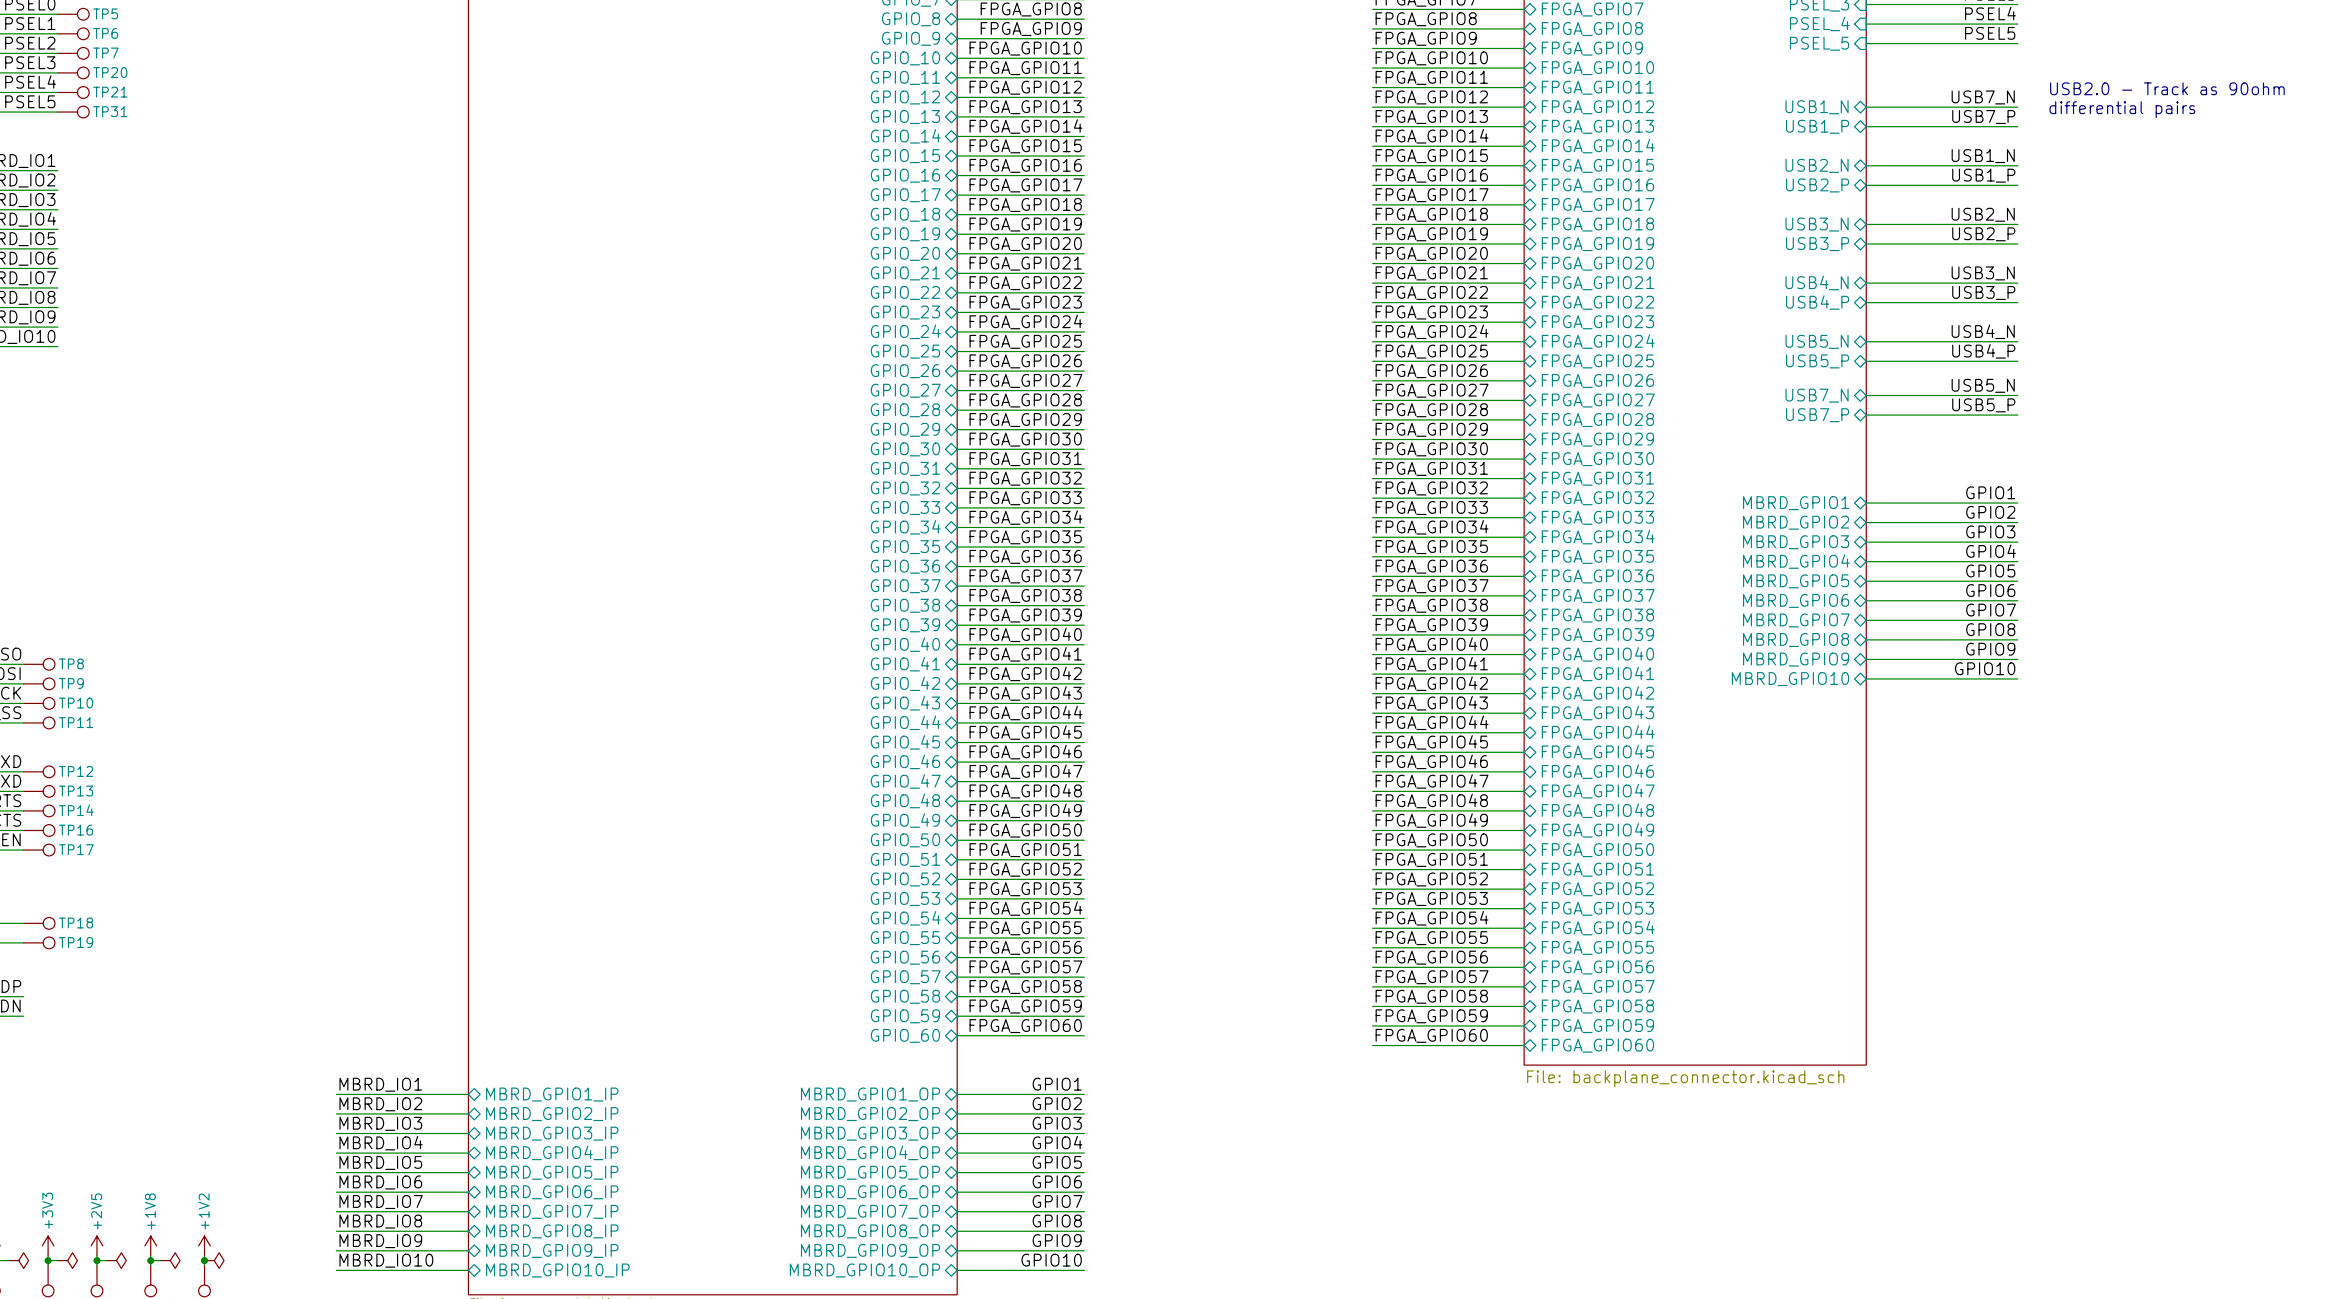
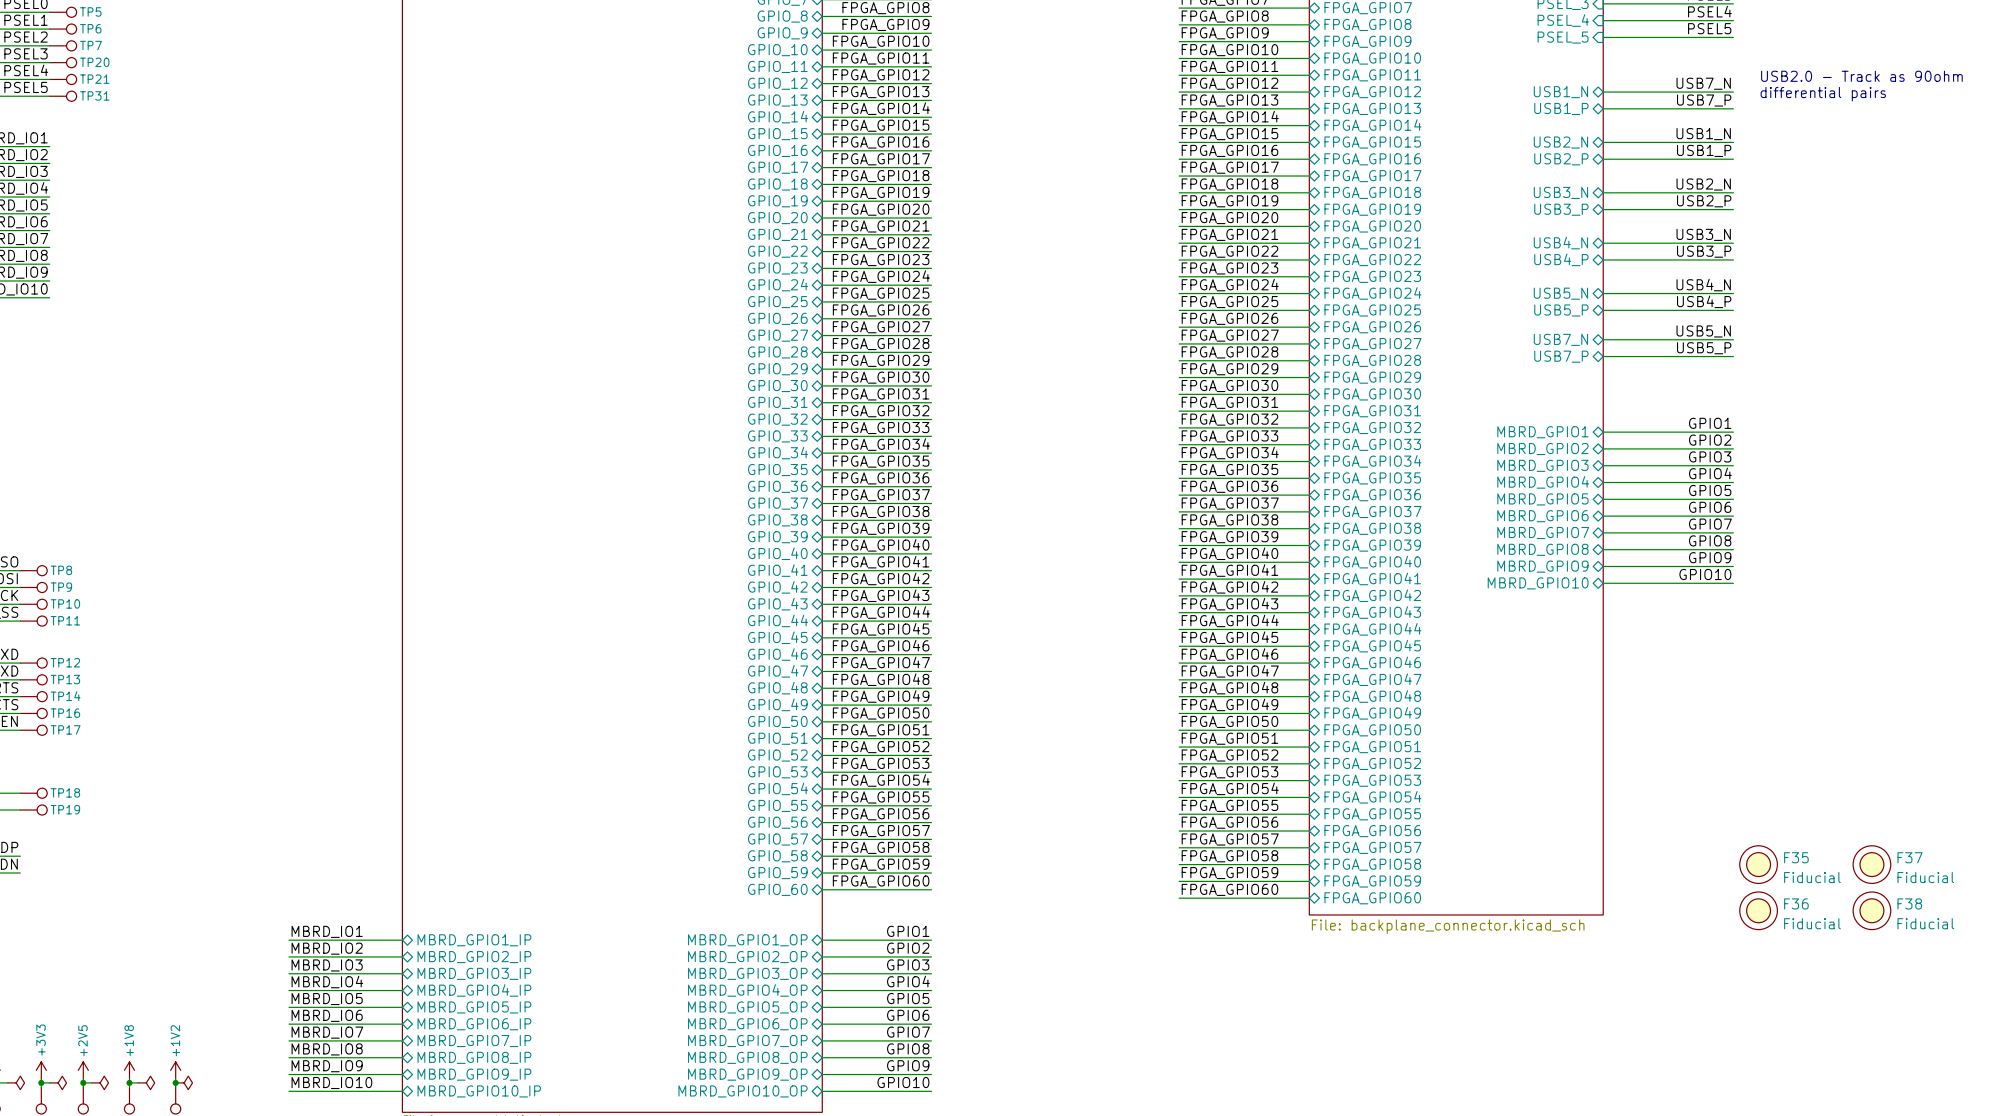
F35: none -> Fiducial (1758, 864)
F37: none -> Fiducial (1871, 864)
F36: none -> Fiducial (1758, 910)
F38: none -> Fiducial (1871, 910)

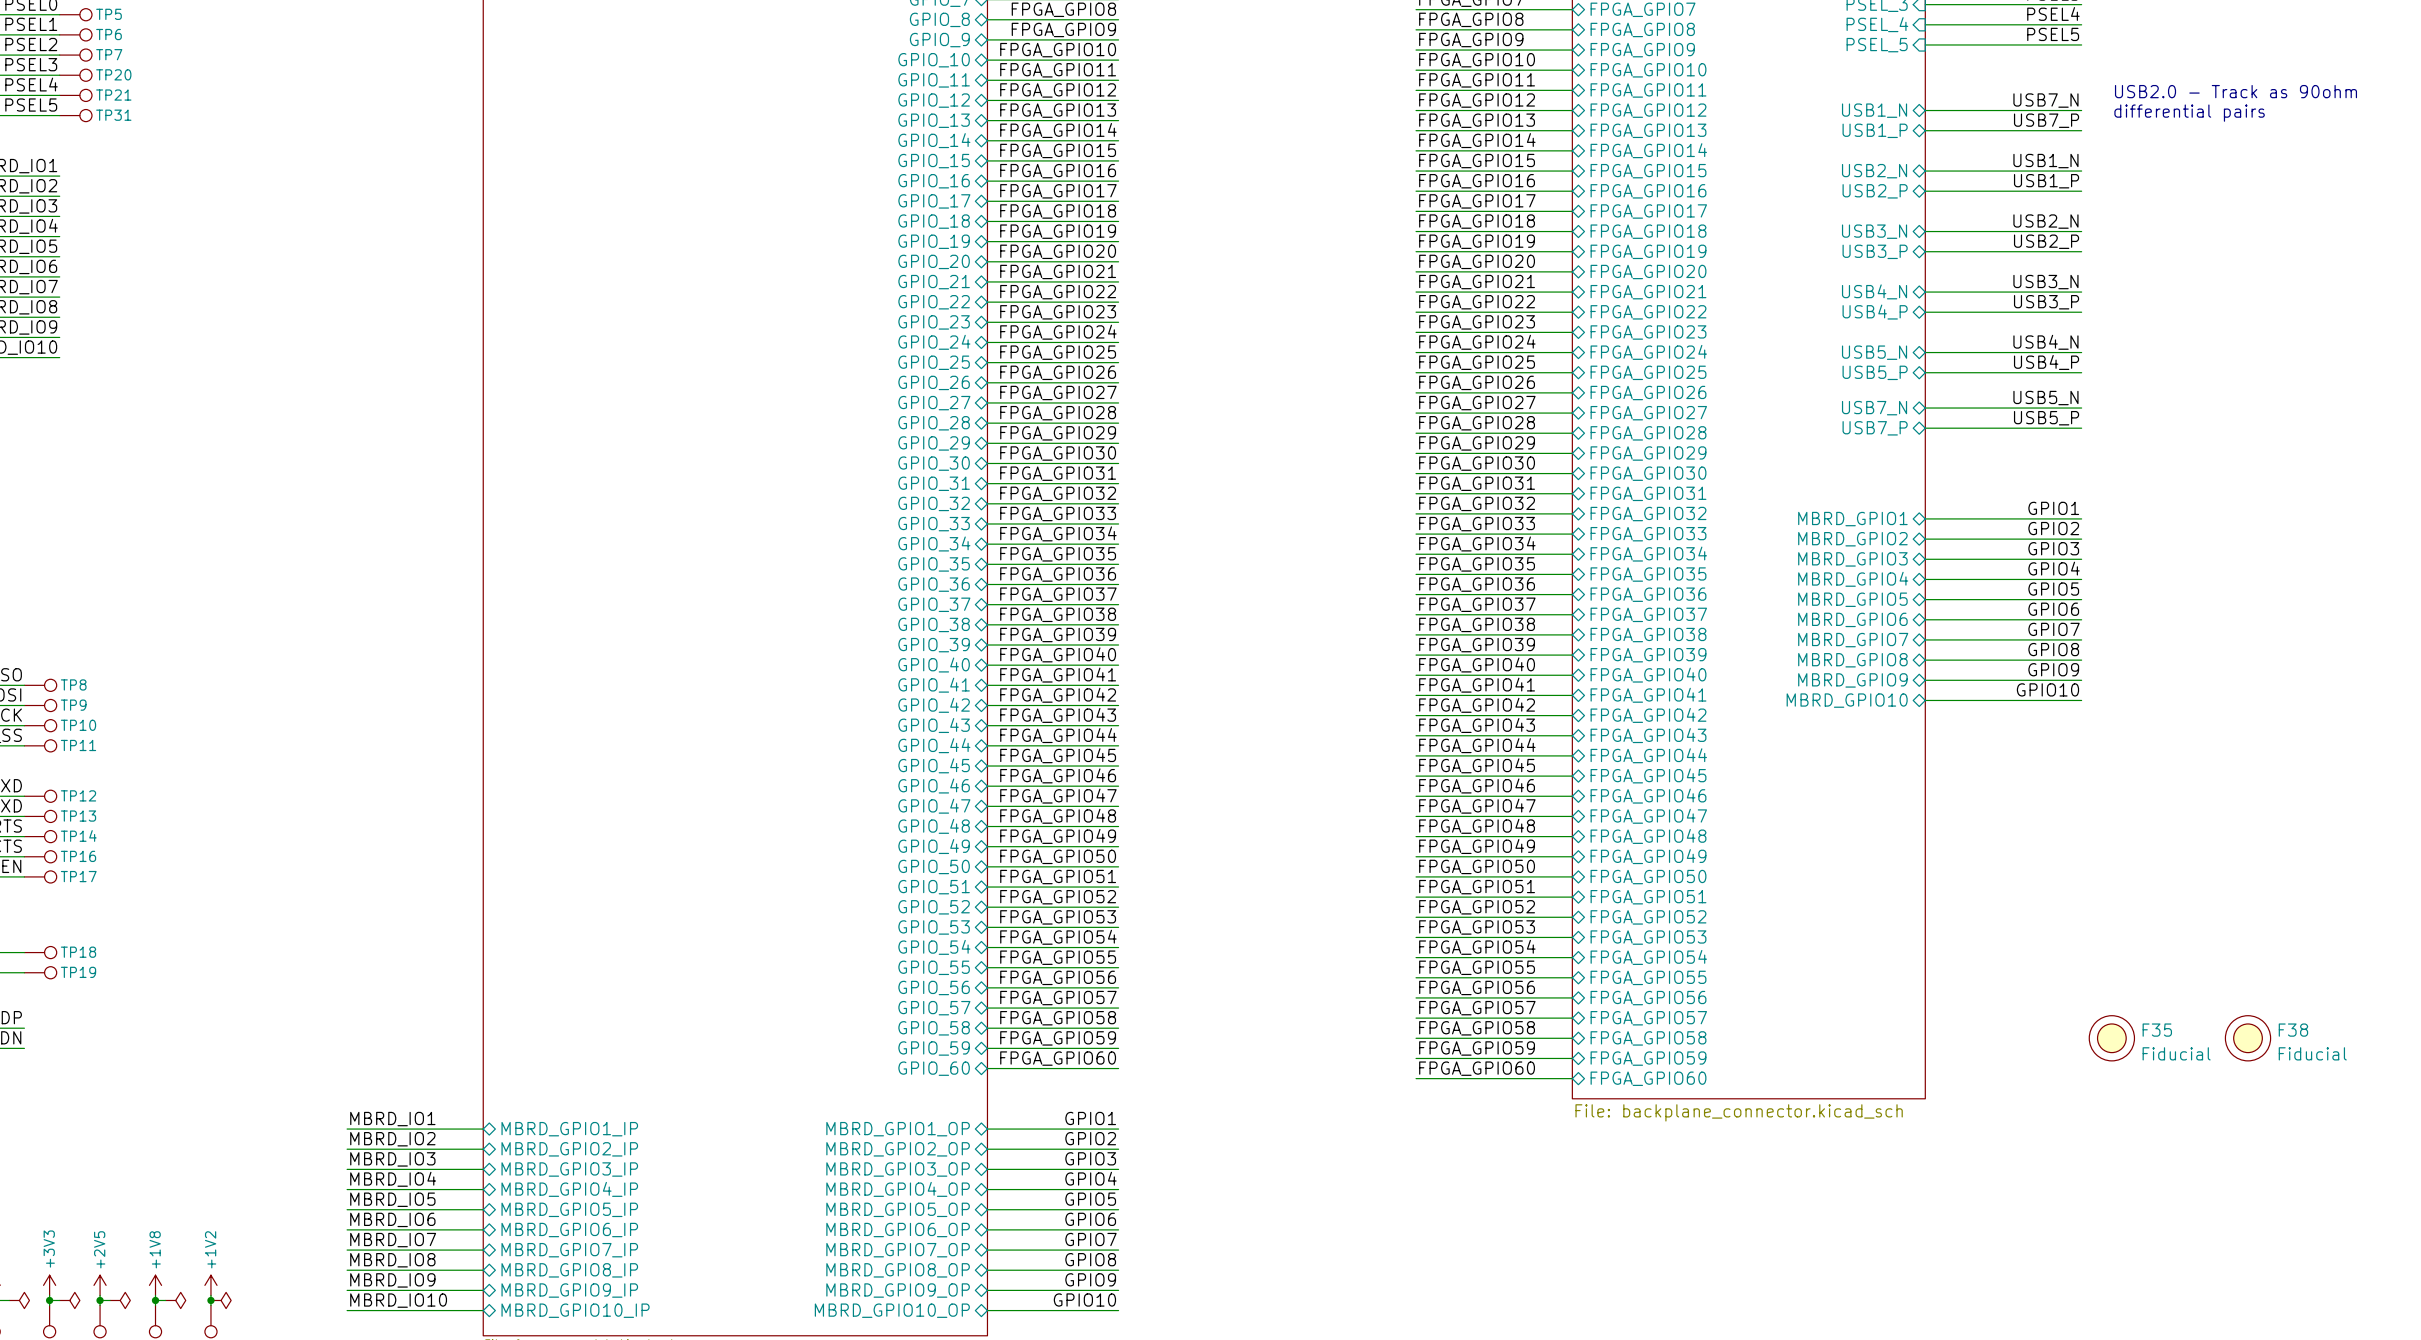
F37 name: F37 (1910, 857) -> F38 (2293, 1030)
F36: Fiducial (1758, 910) -> none
F38: Fiducial (1871, 910) -> none

